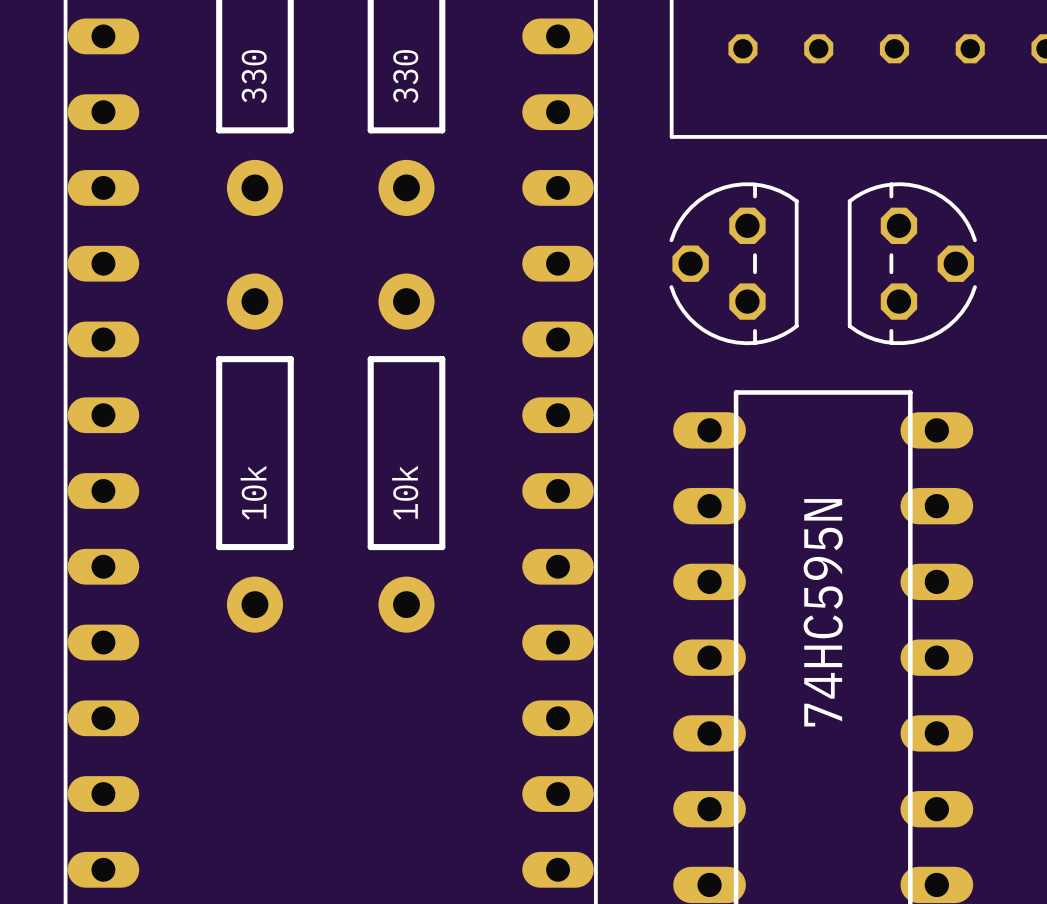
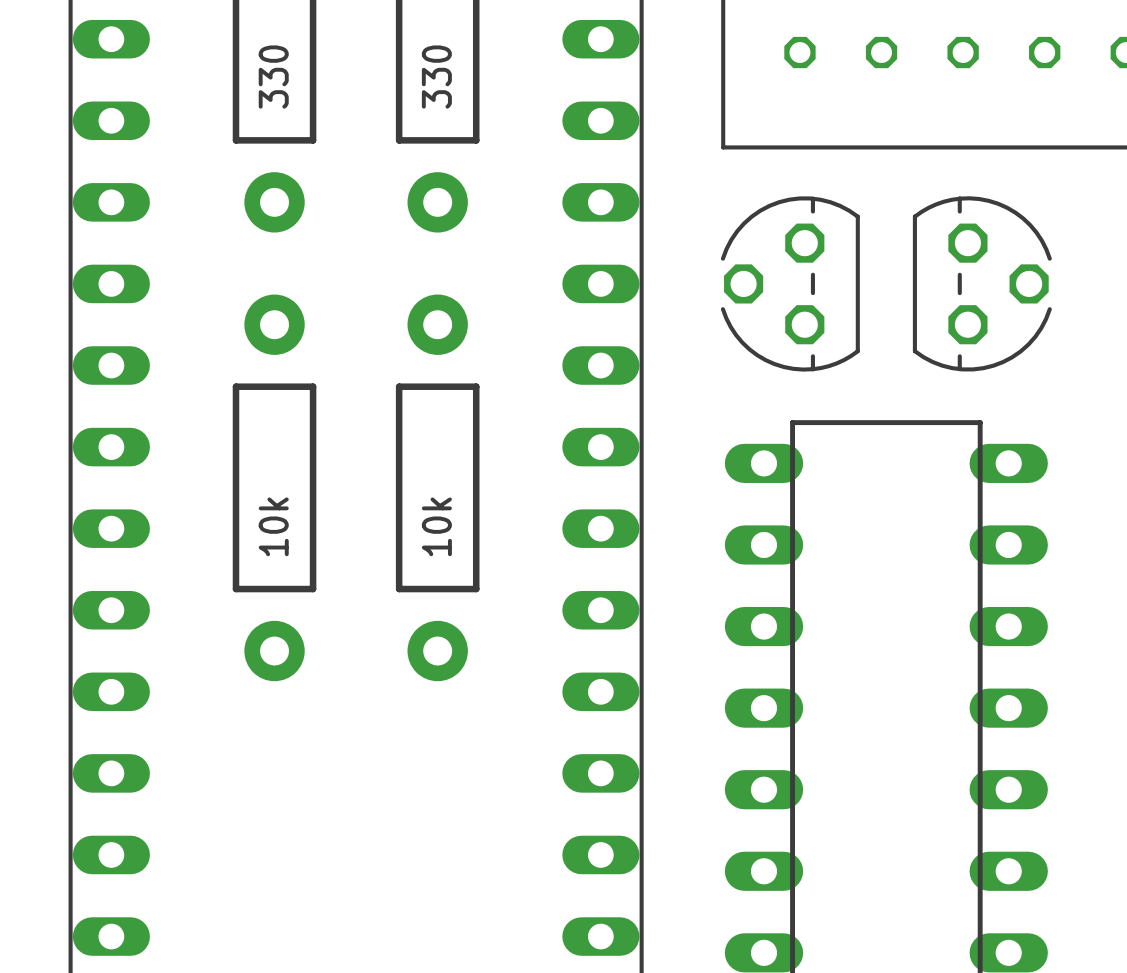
part value: 74HC595N (823, 612) -> none

